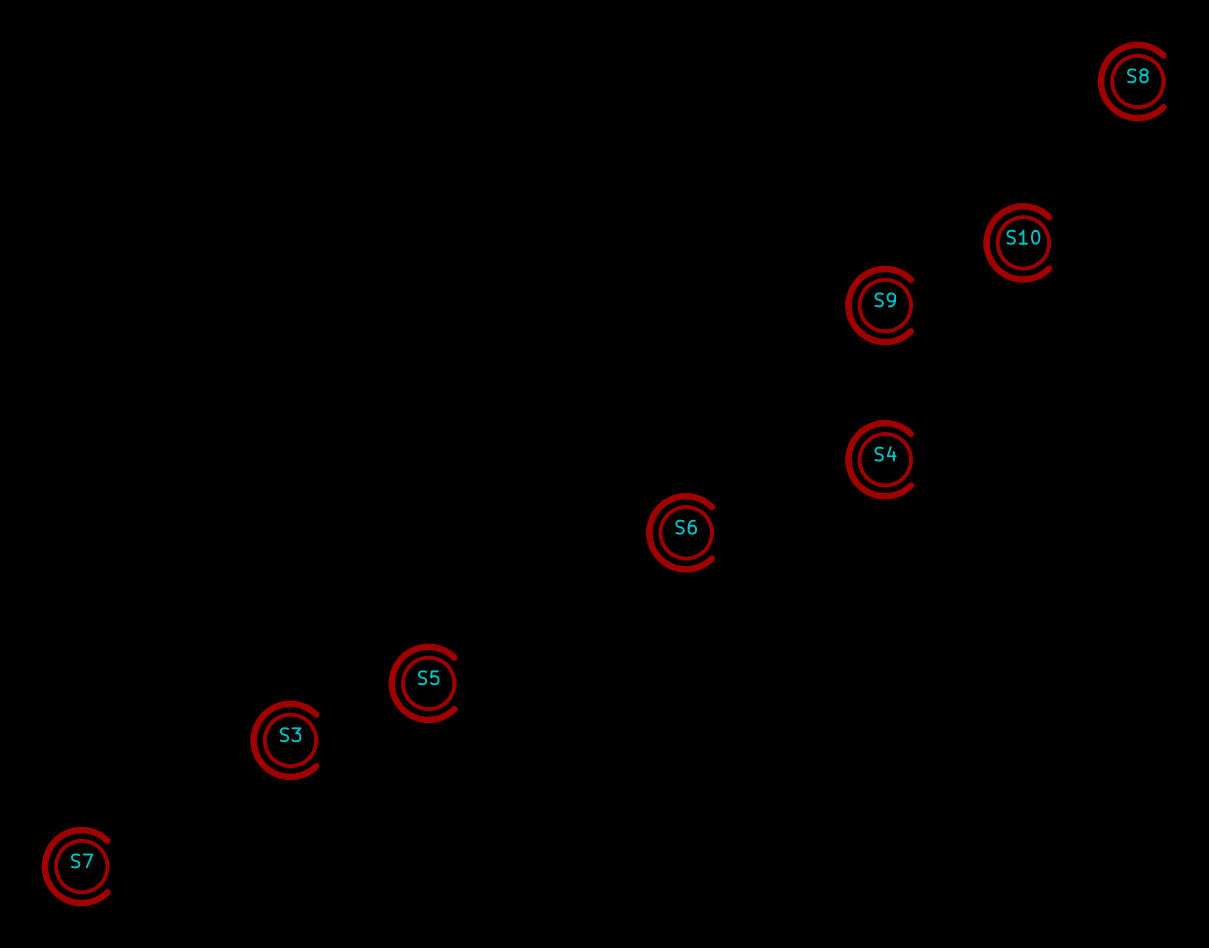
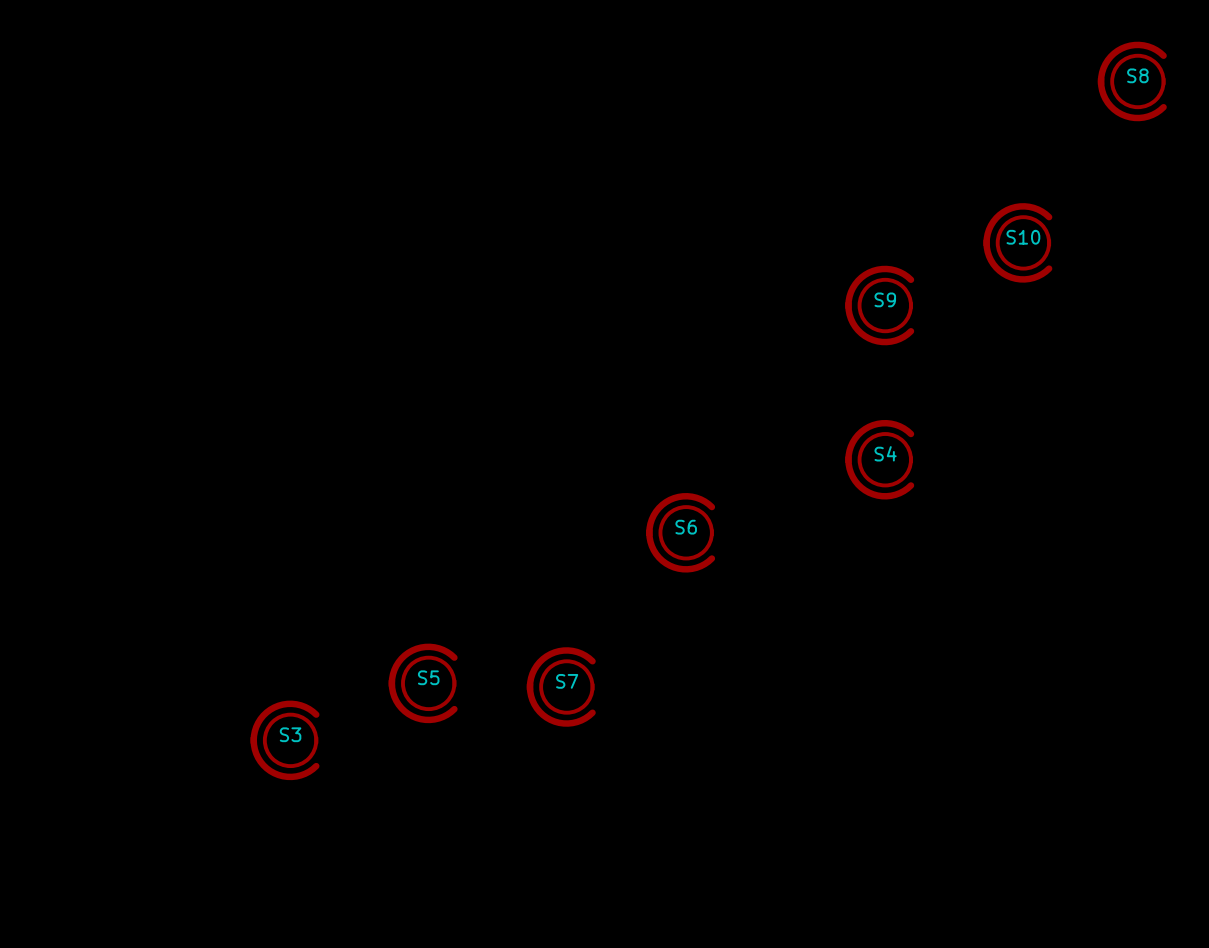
S7 footprint: [41, 826, 111, 907] -> [526, 647, 596, 727]

